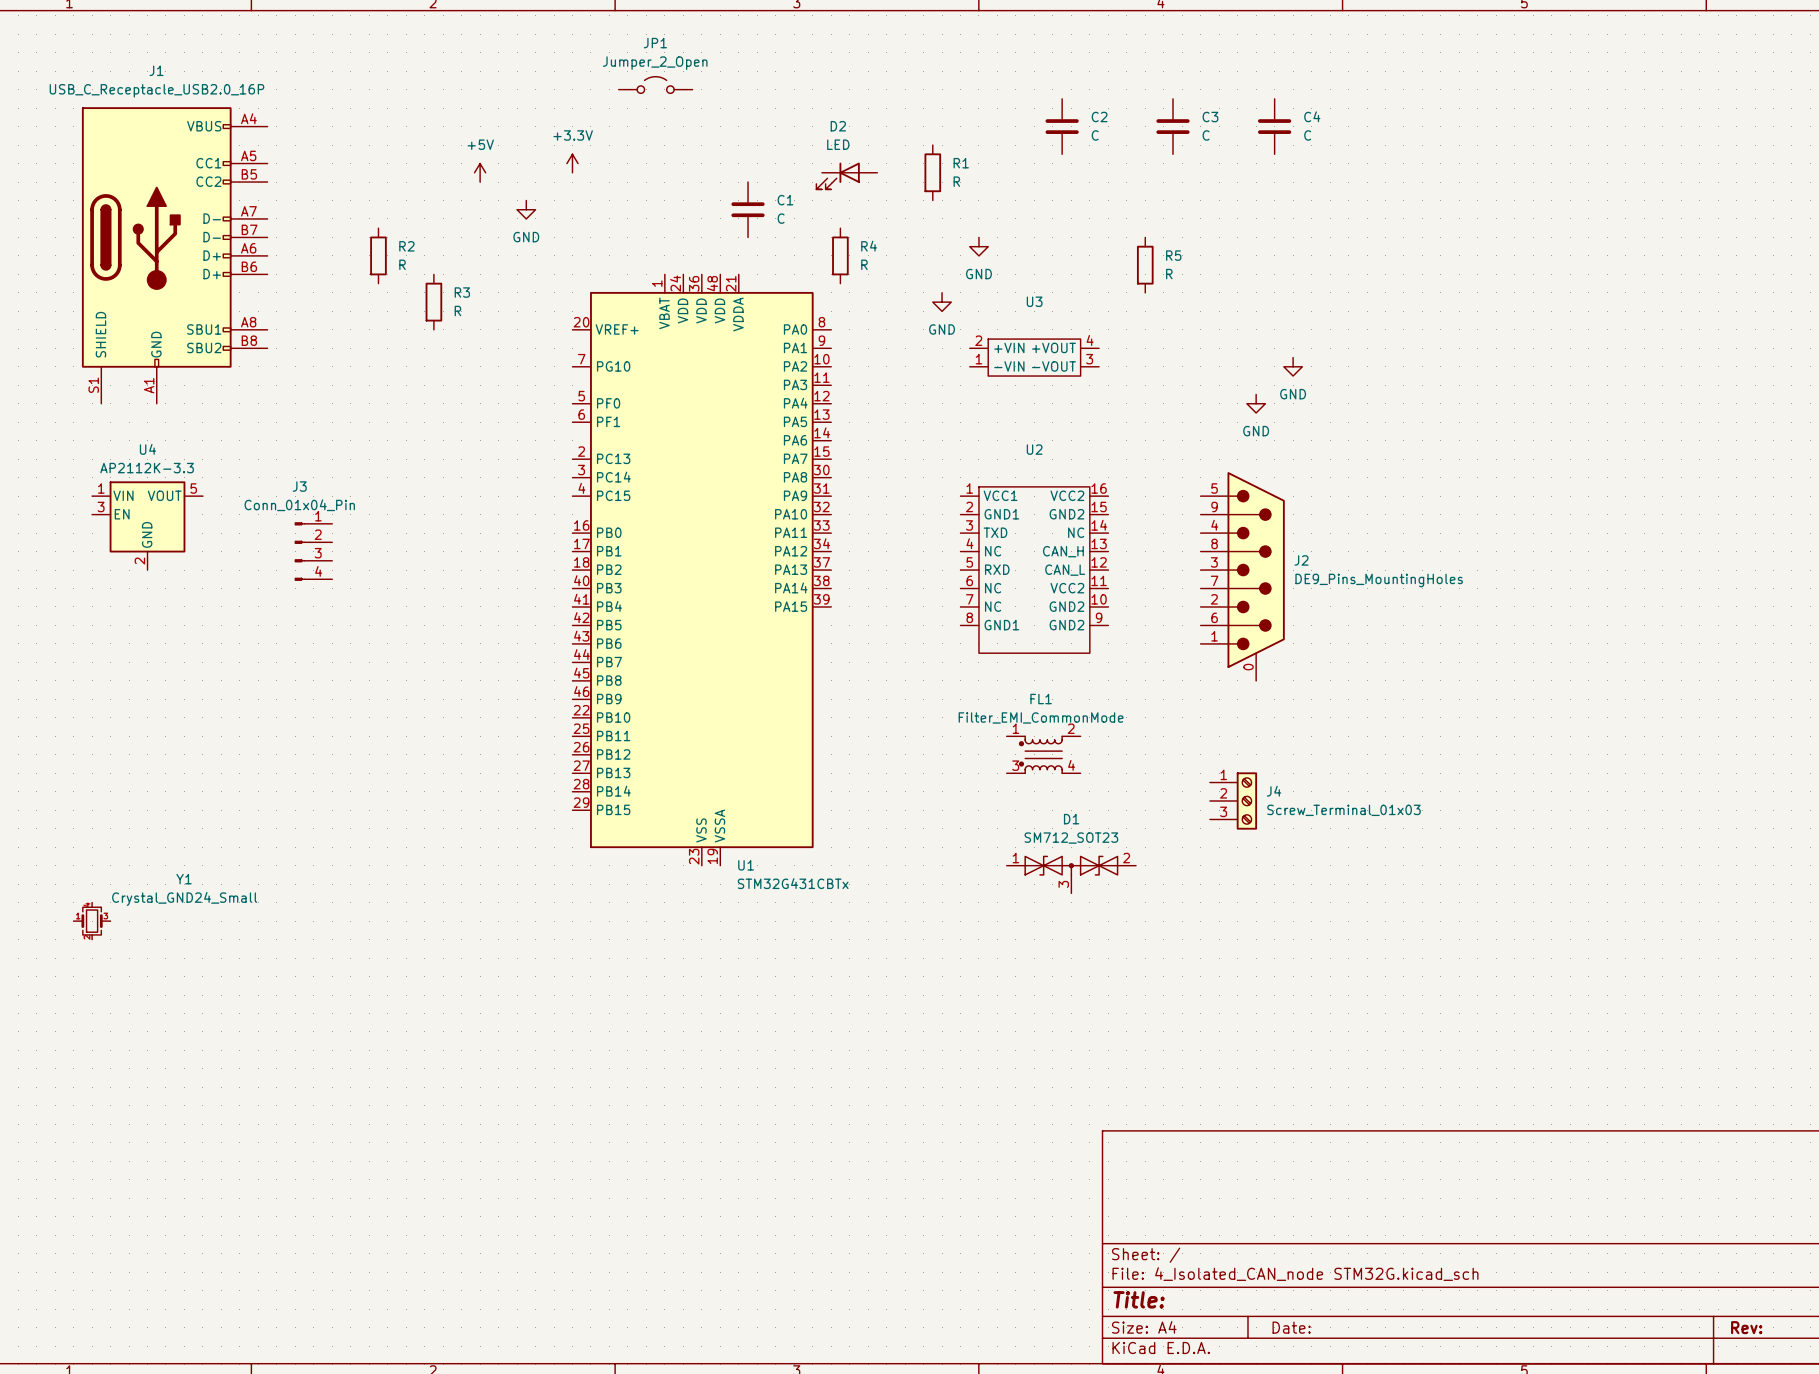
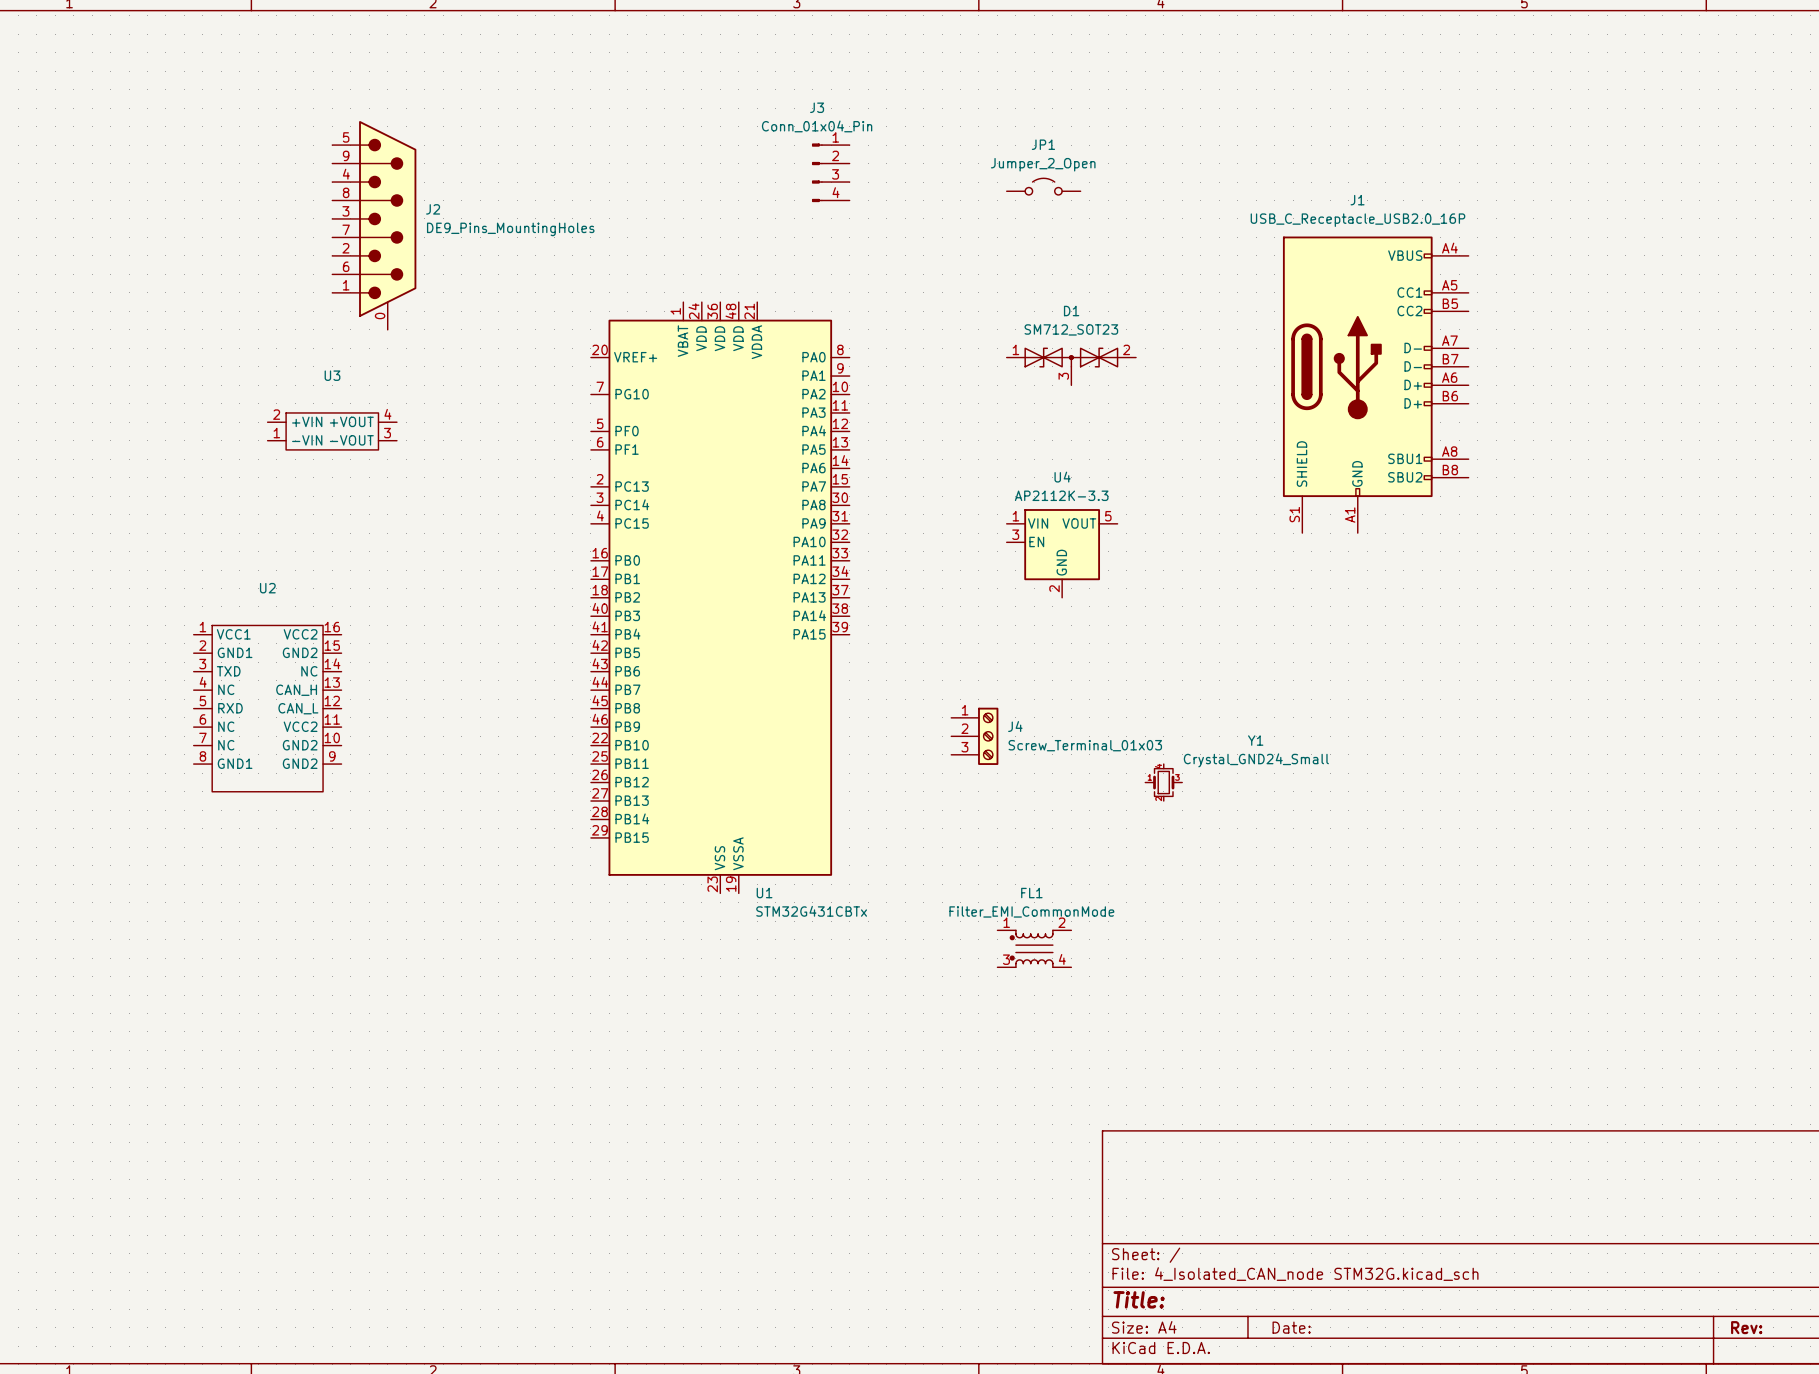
JP1 position: (655, 85) -> (1043, 186)
C2: C (1062, 126) -> none
C3: C (1172, 126) -> none
C4: C (1274, 126) -> none
power symbol: +3.3V (572, 163) -> none
power symbol: +5V (480, 172) -> none
R1: R (932, 172) -> none
D2: LED (846, 176) -> none
power symbol: GND (526, 209) -> none
C1: C (748, 209) -> none
power symbol: GND (978, 246) -> none
J1 position: (174, 255) -> (1375, 384)
R2: R (378, 255) -> none
R4: R (840, 255) -> none
R5: R (1145, 265) -> none
R3: R (433, 302) -> none
power symbol: GND (942, 302) -> none
U3 position: (1034, 357) -> (332, 431)
power symbol: GND (1293, 366) -> none
power symbol: GND (1256, 403) -> none
U4 position: (147, 525) -> (1062, 553)
J3 position: (313, 551) -> (830, 172)
U1 position: (701, 570) -> (720, 597)
U2 position: (1034, 570) -> (267, 708)
J2 position: (1242, 576) -> (374, 225)
FL1 position: (1043, 754) -> (1034, 948)
J4 position: (1233, 801) -> (974, 736)
D1 position: (1071, 874) -> (1071, 366)
Y1 position: (92, 921) -> (1163, 782)

